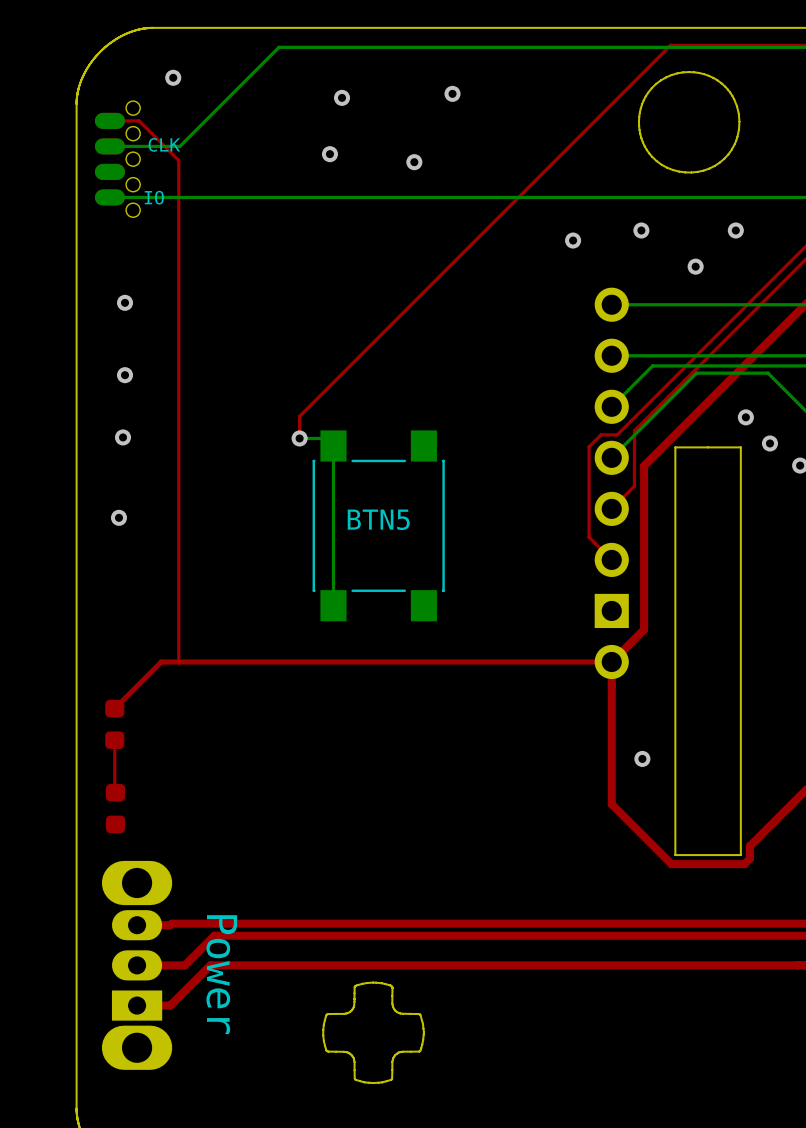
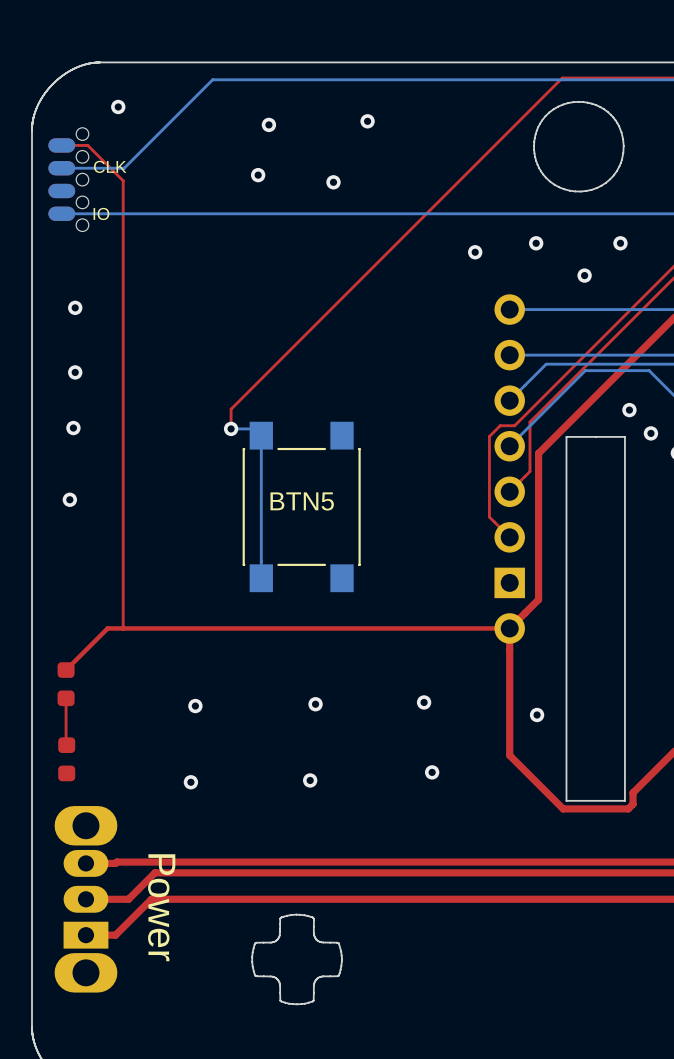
via: none -> (424, 702)
via: none -> (315, 704)
via: none -> (195, 706)
via: none -> (432, 772)
via: none -> (310, 780)
via: none -> (190, 782)

